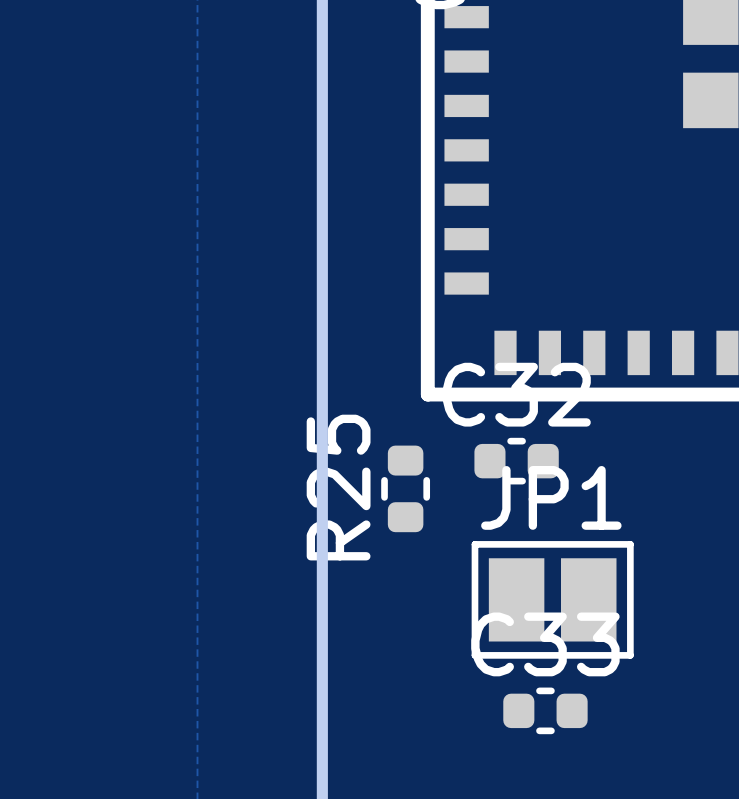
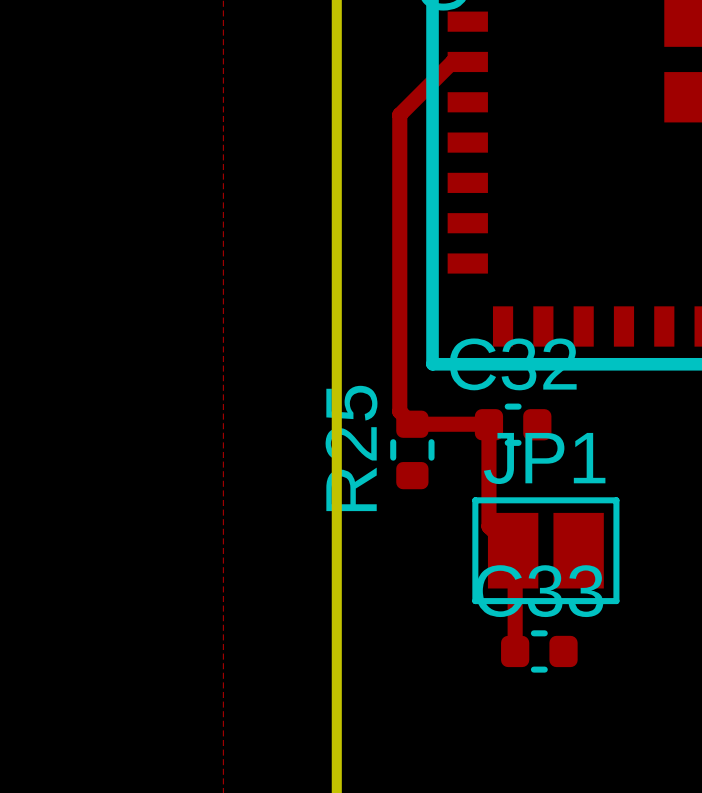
track: none -> (467, 61) (452, 61) (399, 114) (399, 411) (412, 424) (488, 424)
track: none -> (488, 424) (488, 526) (515, 552) (515, 651)

